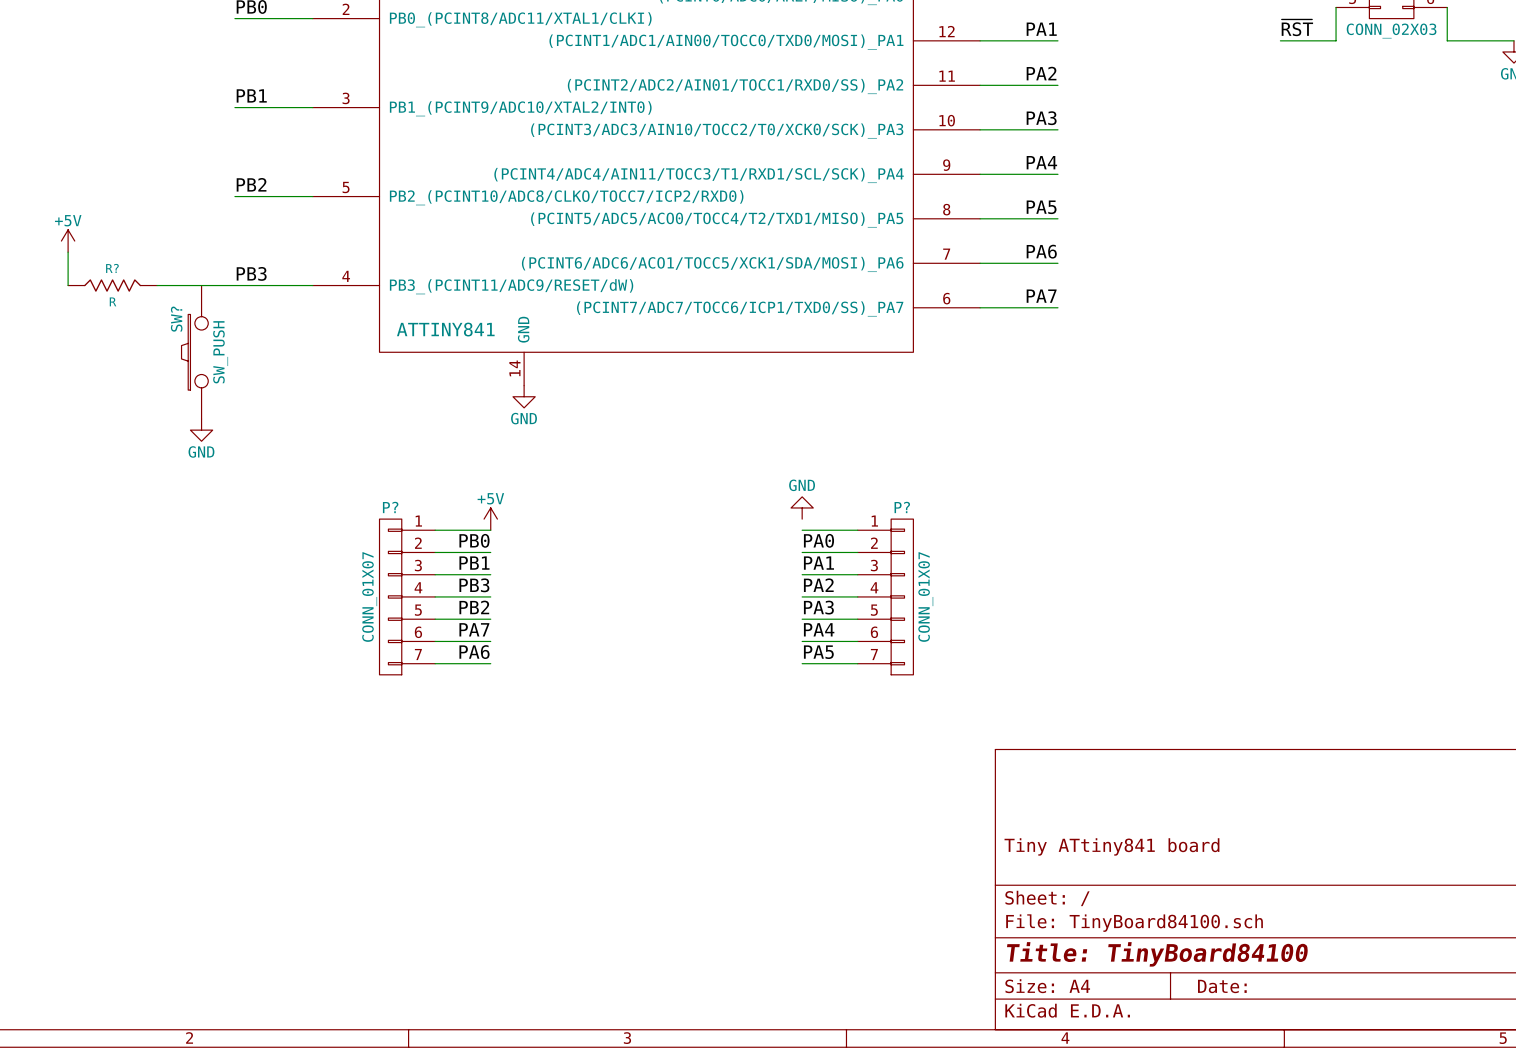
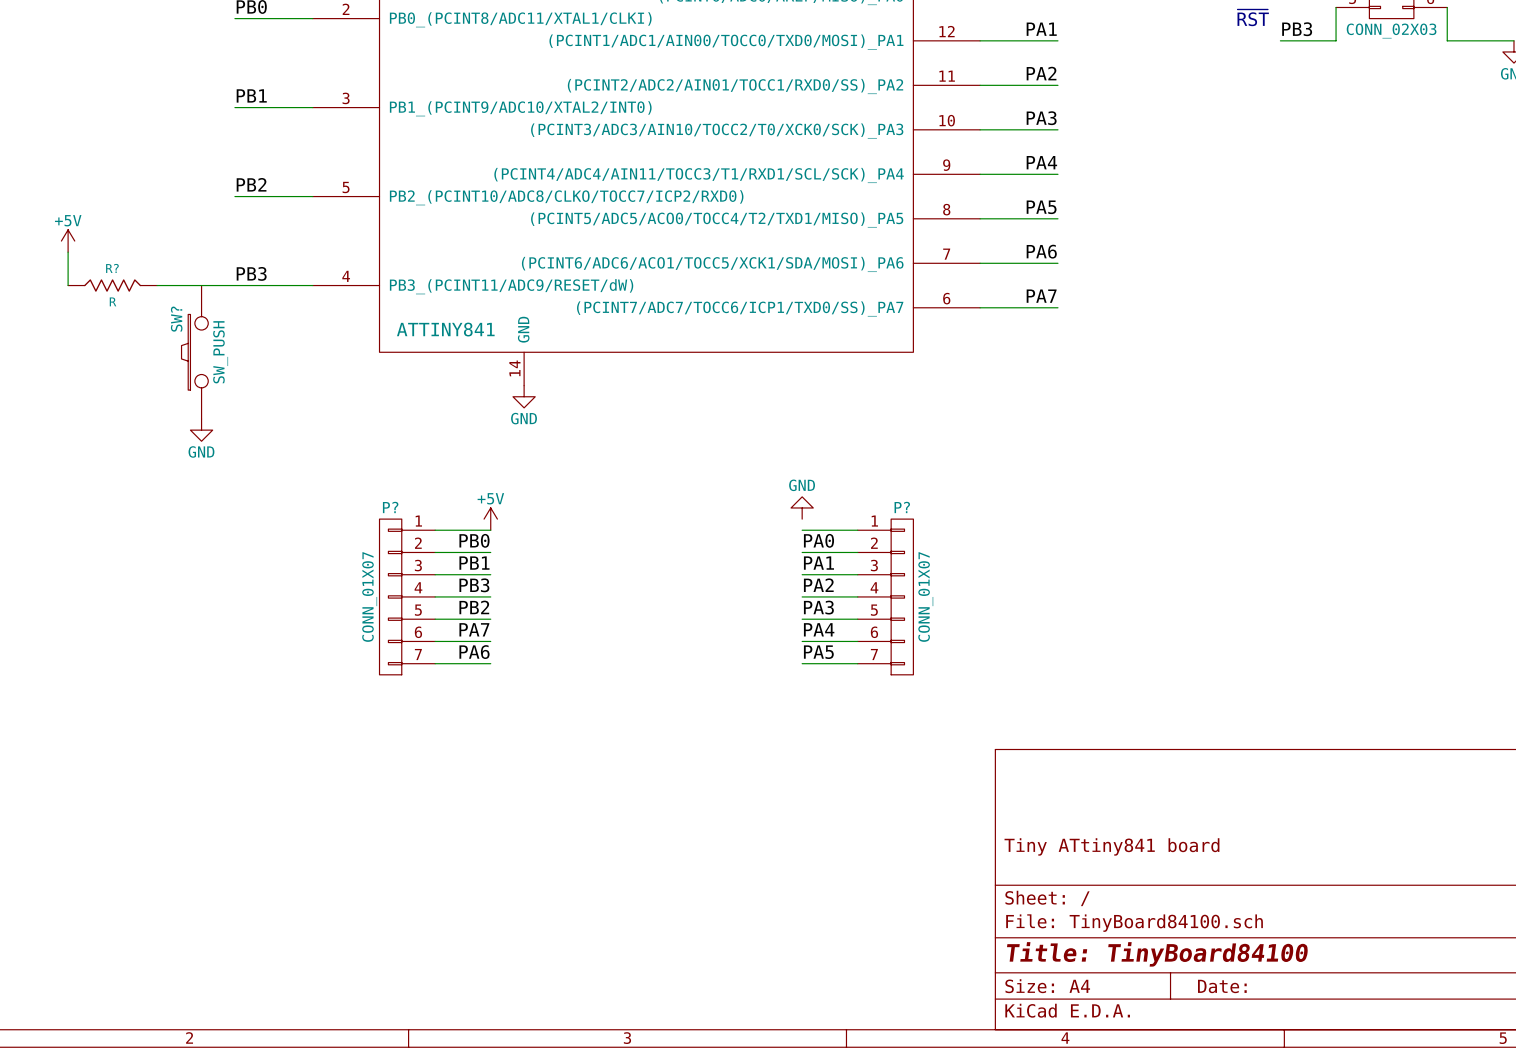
text: none -> ~{RST} (1253, 17)
label: ~{RST} (1297, 27) -> PB3 (1297, 29)

